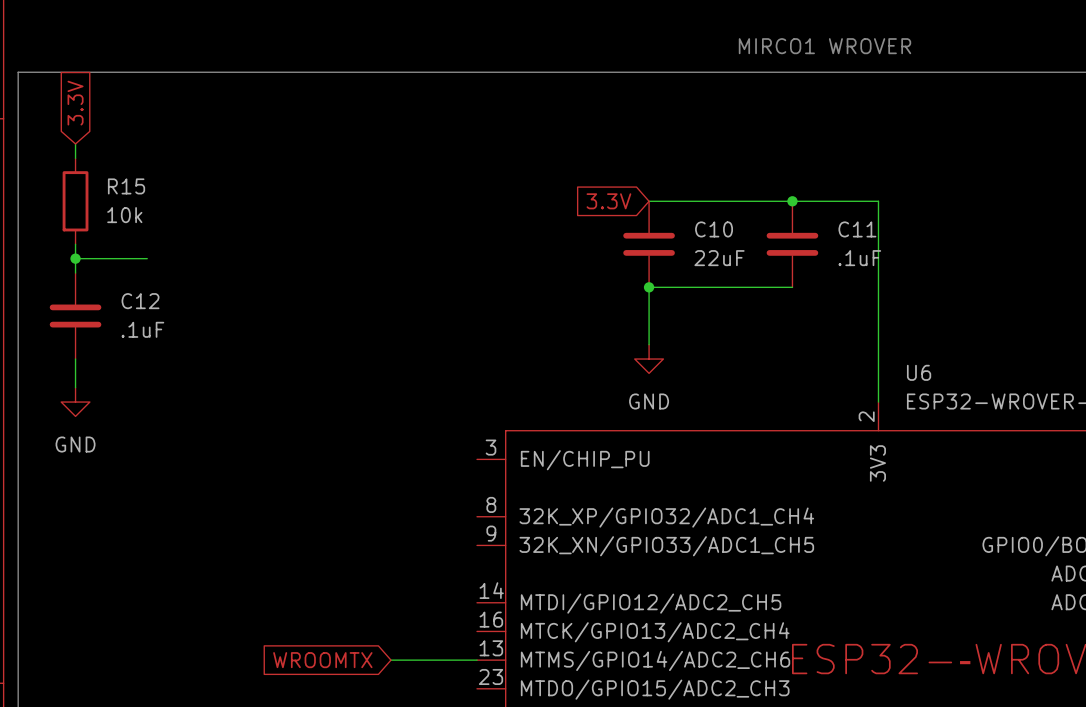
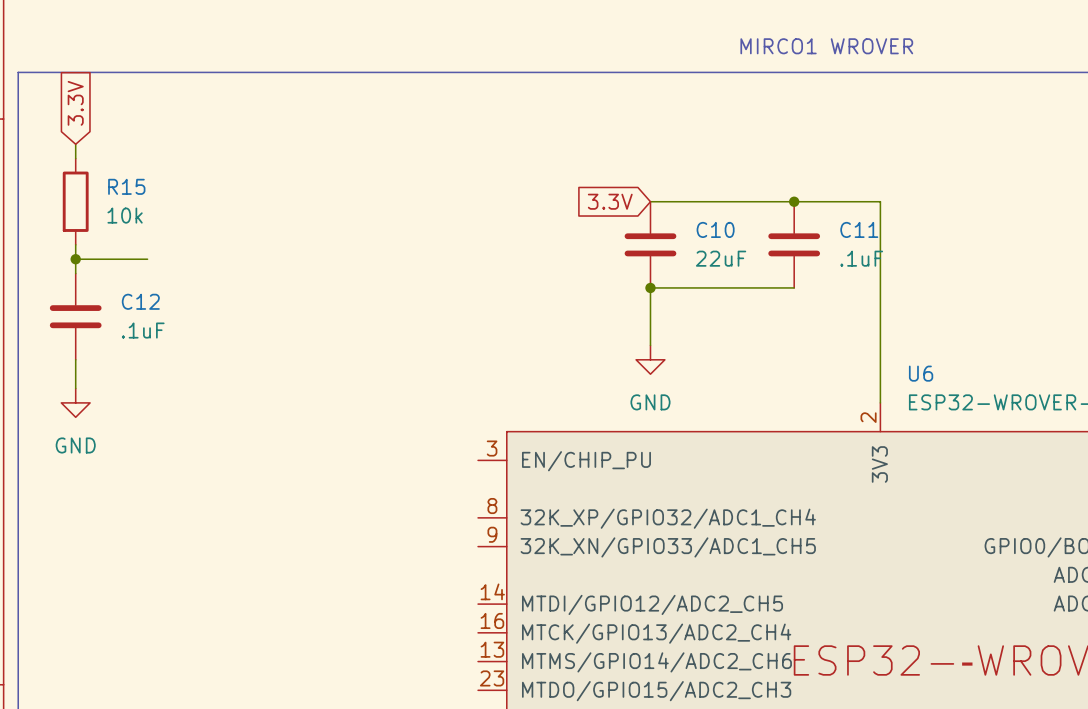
global label: WROOMTX (322, 660) -> none
wire: (390, 660) (477, 660) -> none

